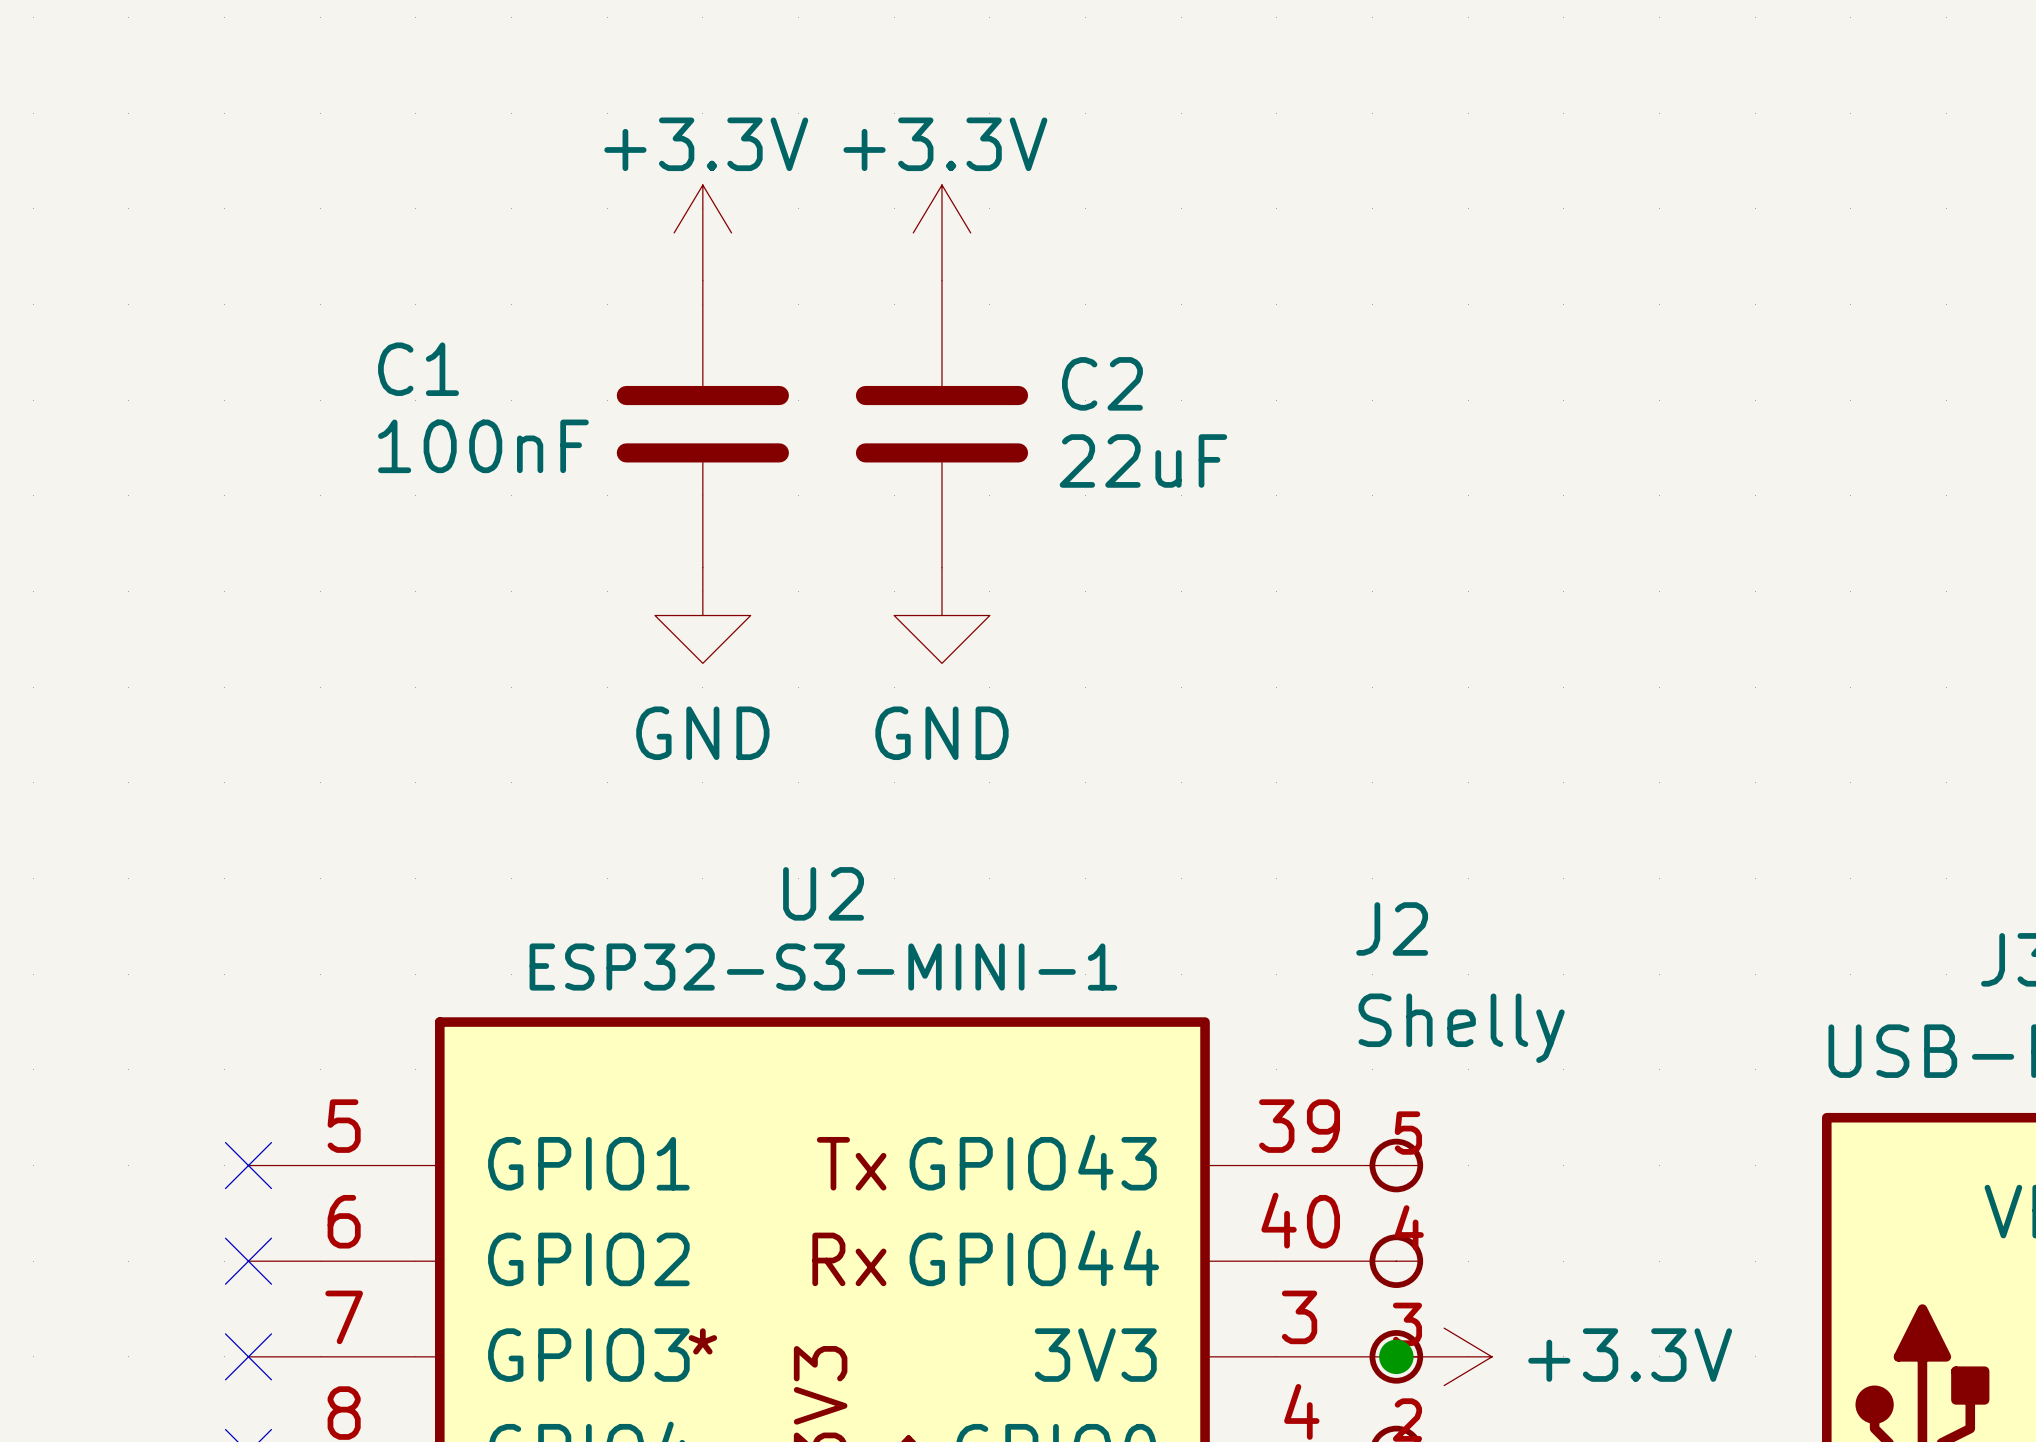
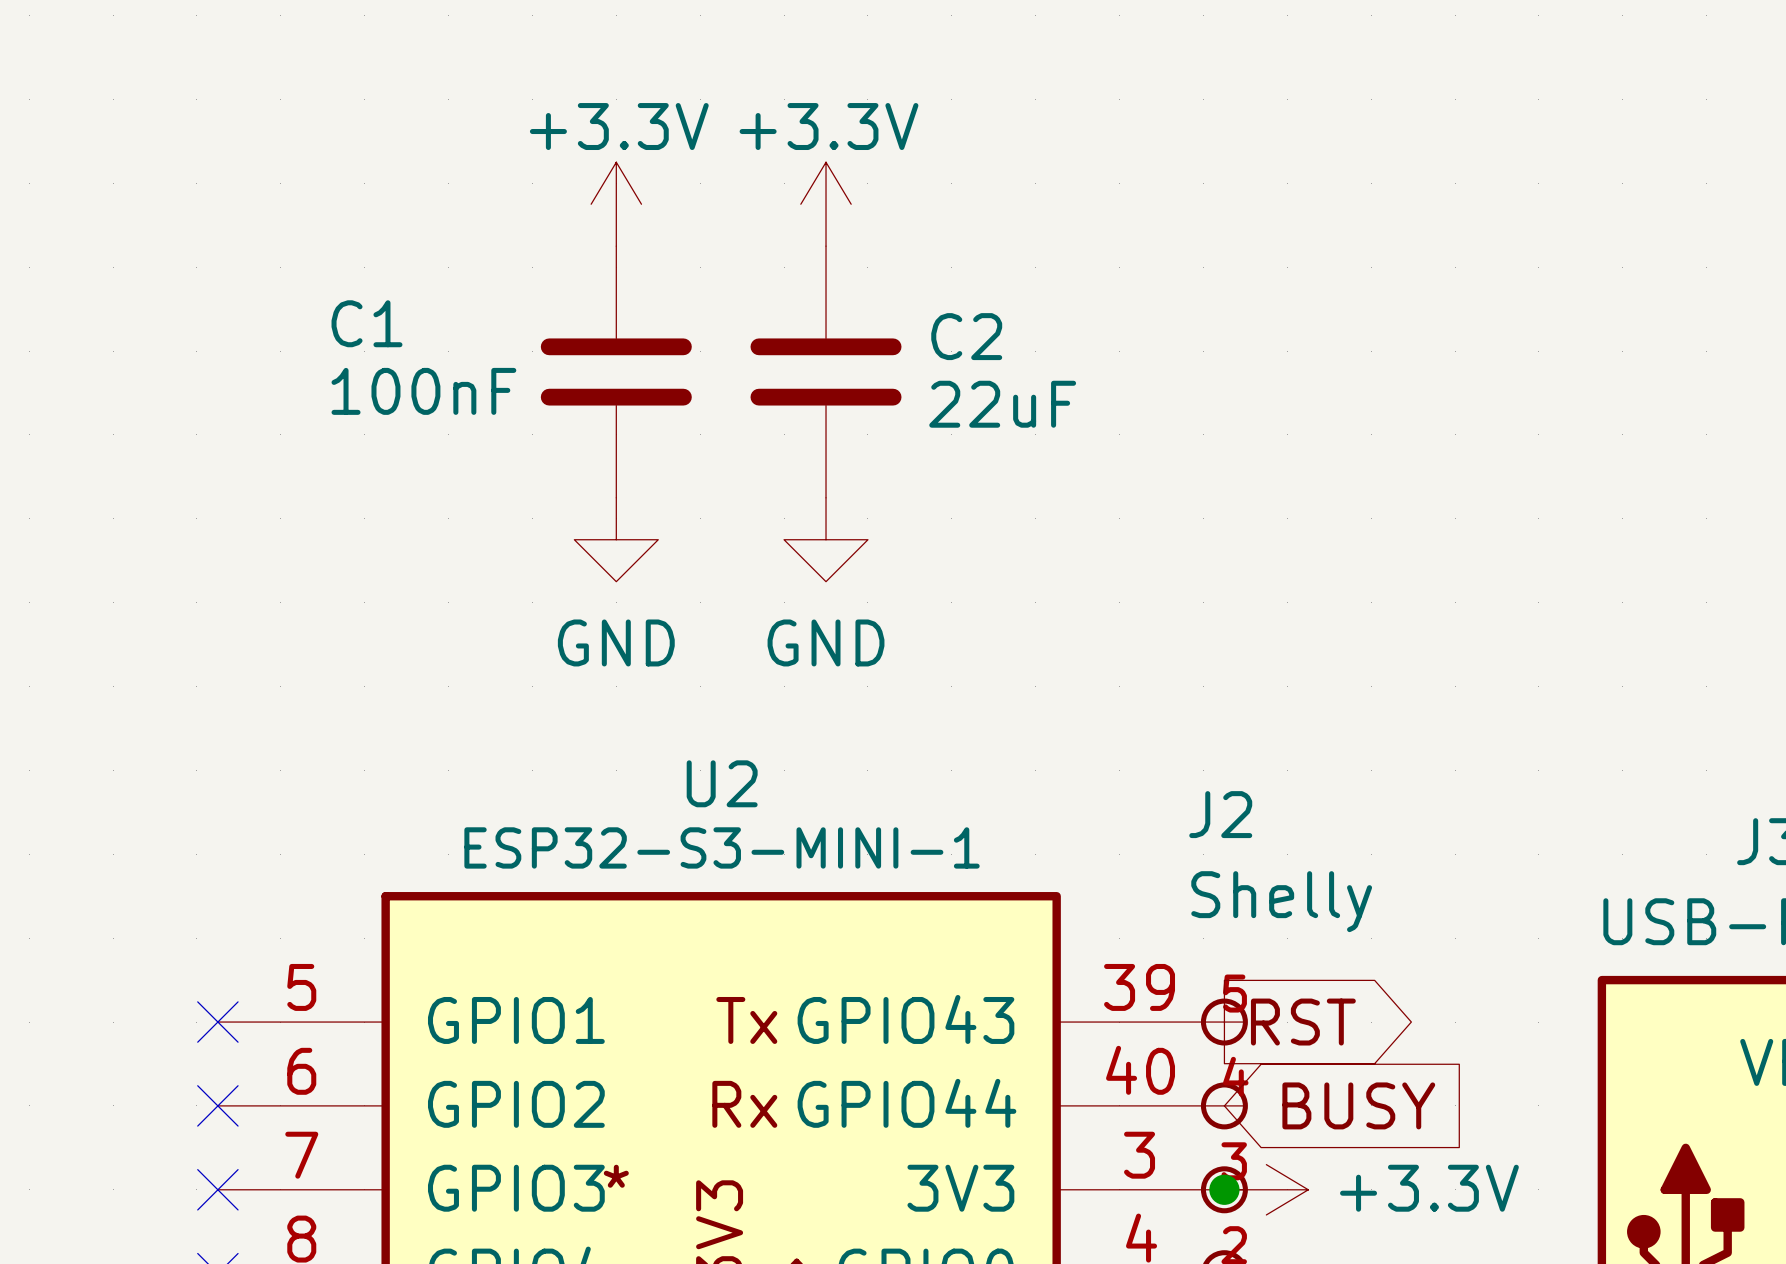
global label: none -> RST (1303, 1022)
global label: none -> BUSY (1358, 1105)

